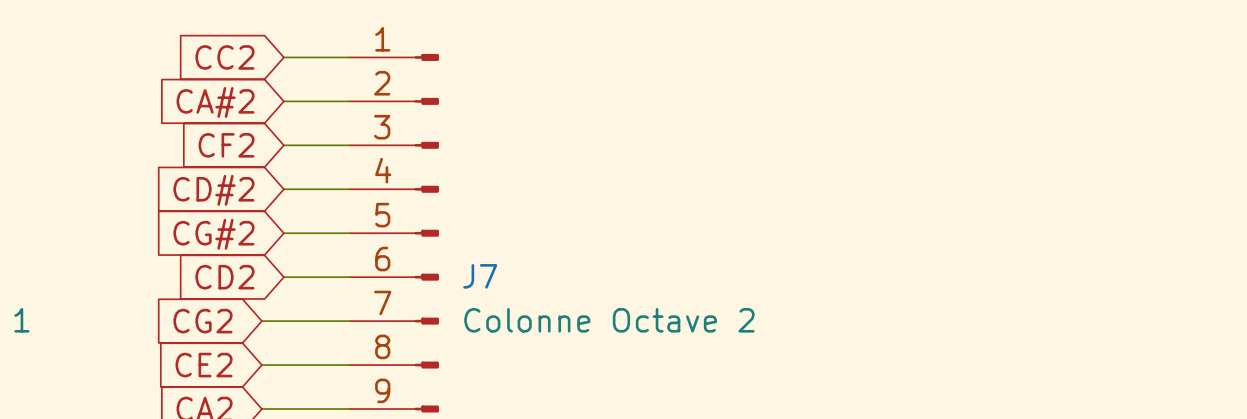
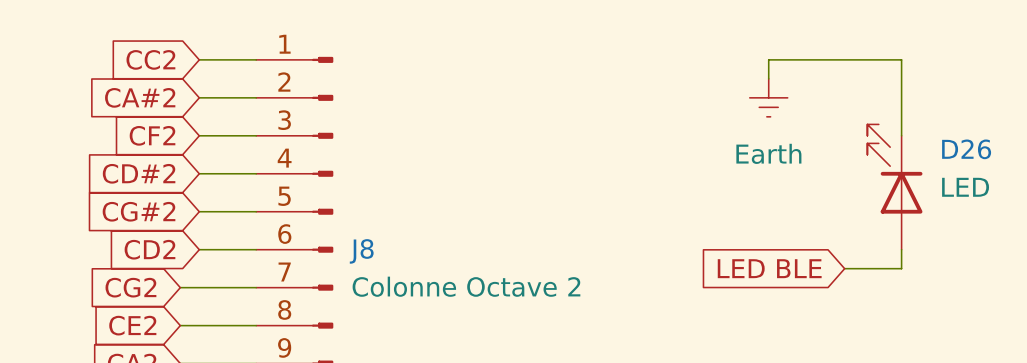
wire: none -> (768, 78) (768, 59) (901, 59) (901, 135)
power symbol: none -> Earth (768, 97)
D26: none -> LED (894, 187)
J7 name: J7 (480, 276) -> J8 (361, 251)
wire: none -> (901, 249) (901, 268) (844, 268)
global label: none -> LED BLE (769, 268)

